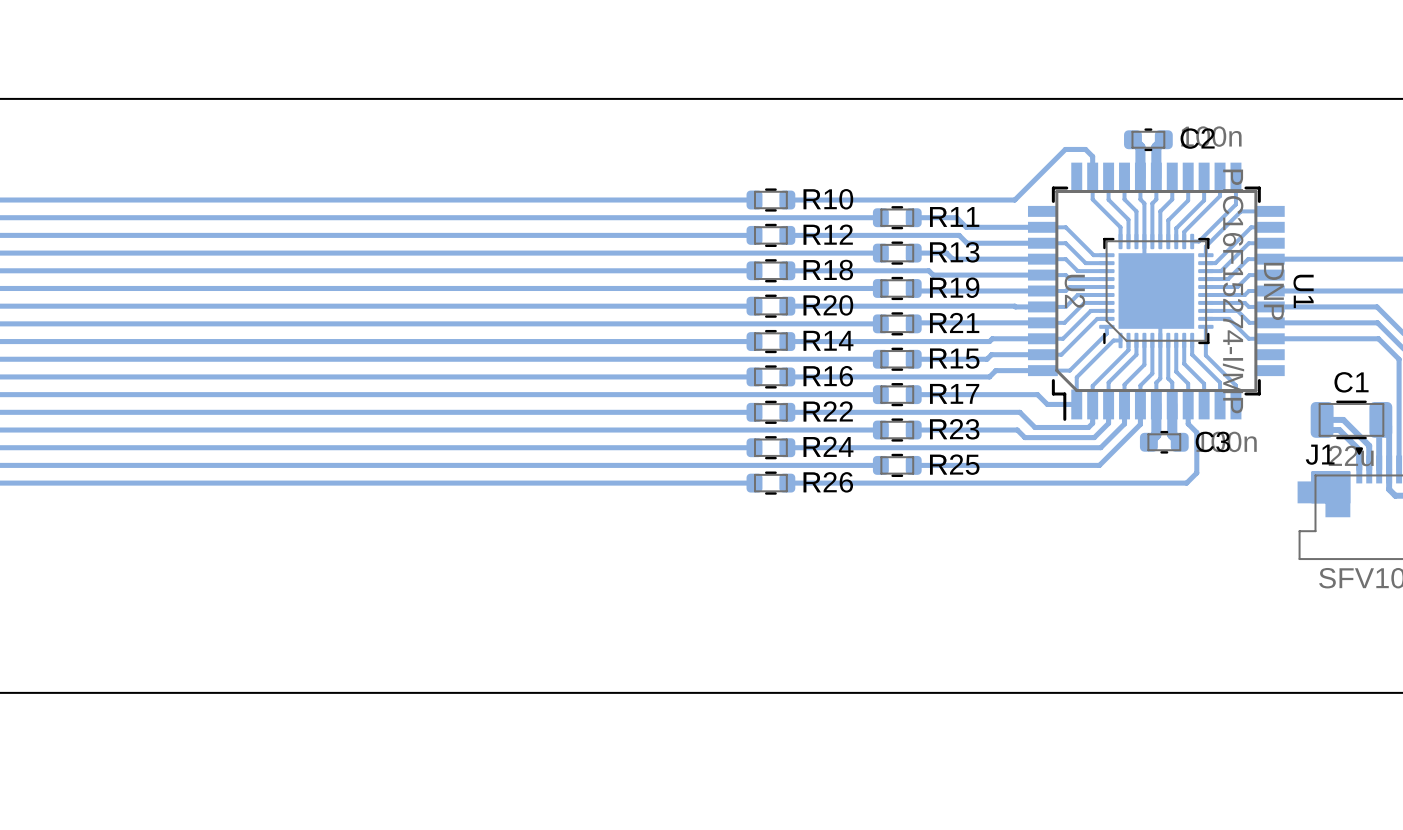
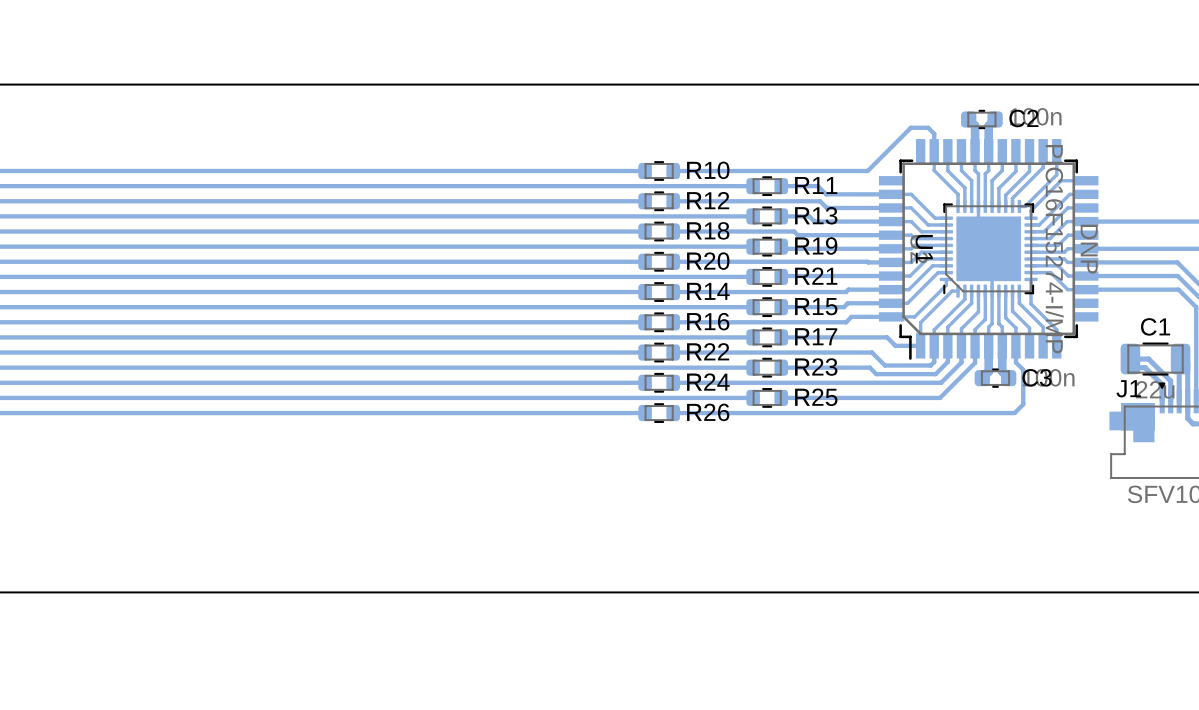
U1 name position: U1 (1303, 291) -> U1 (924, 249)

